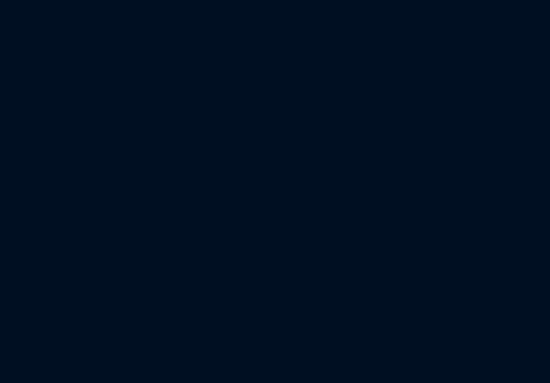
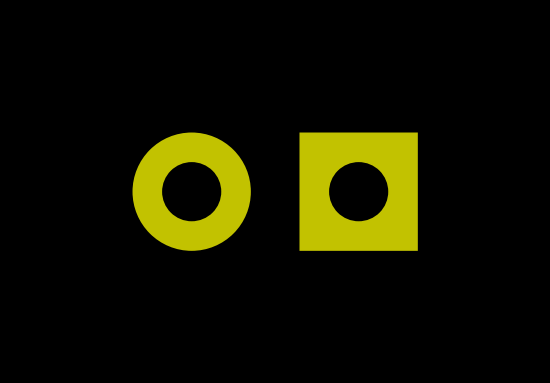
part: none -> (275, 191)

